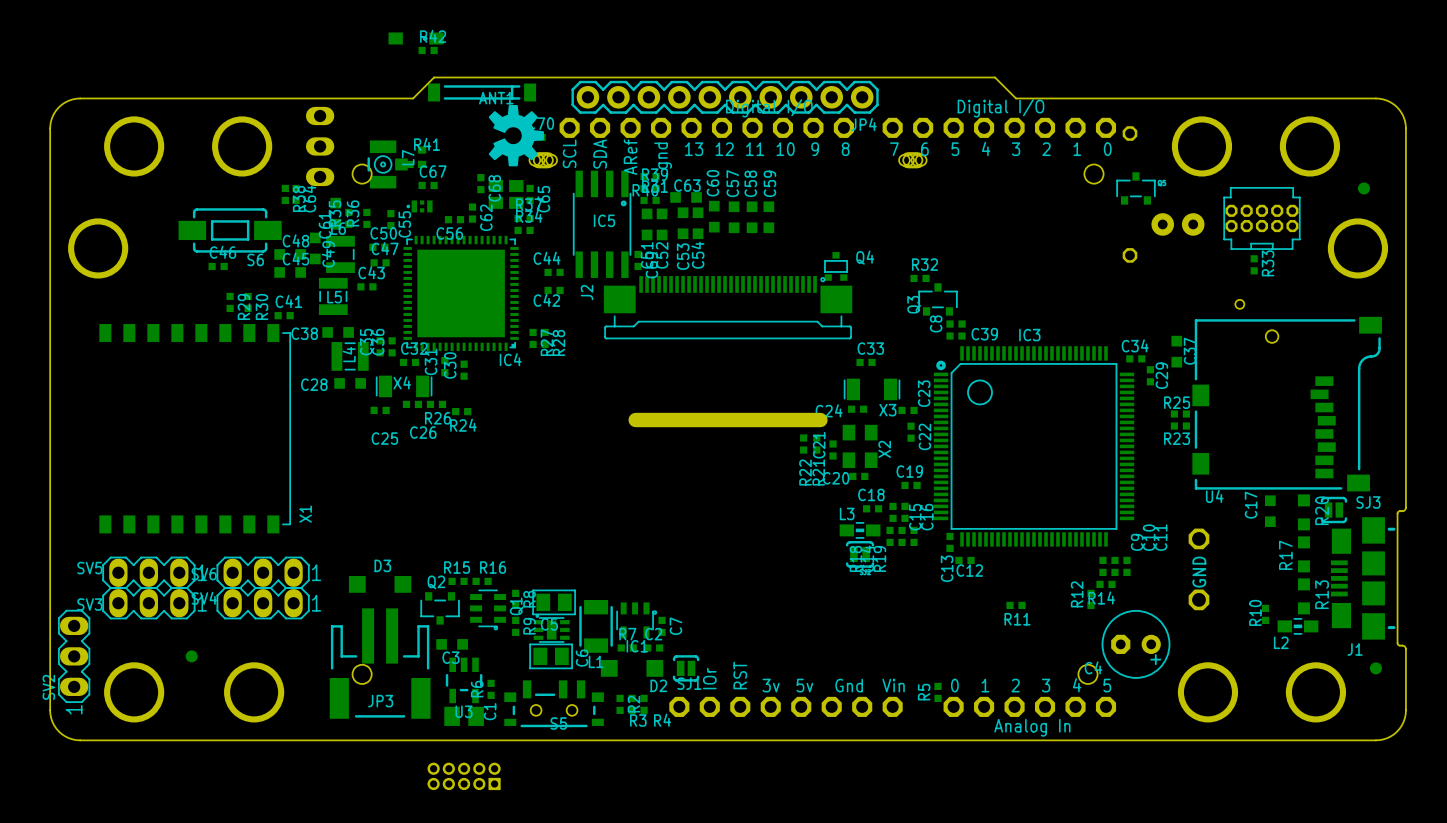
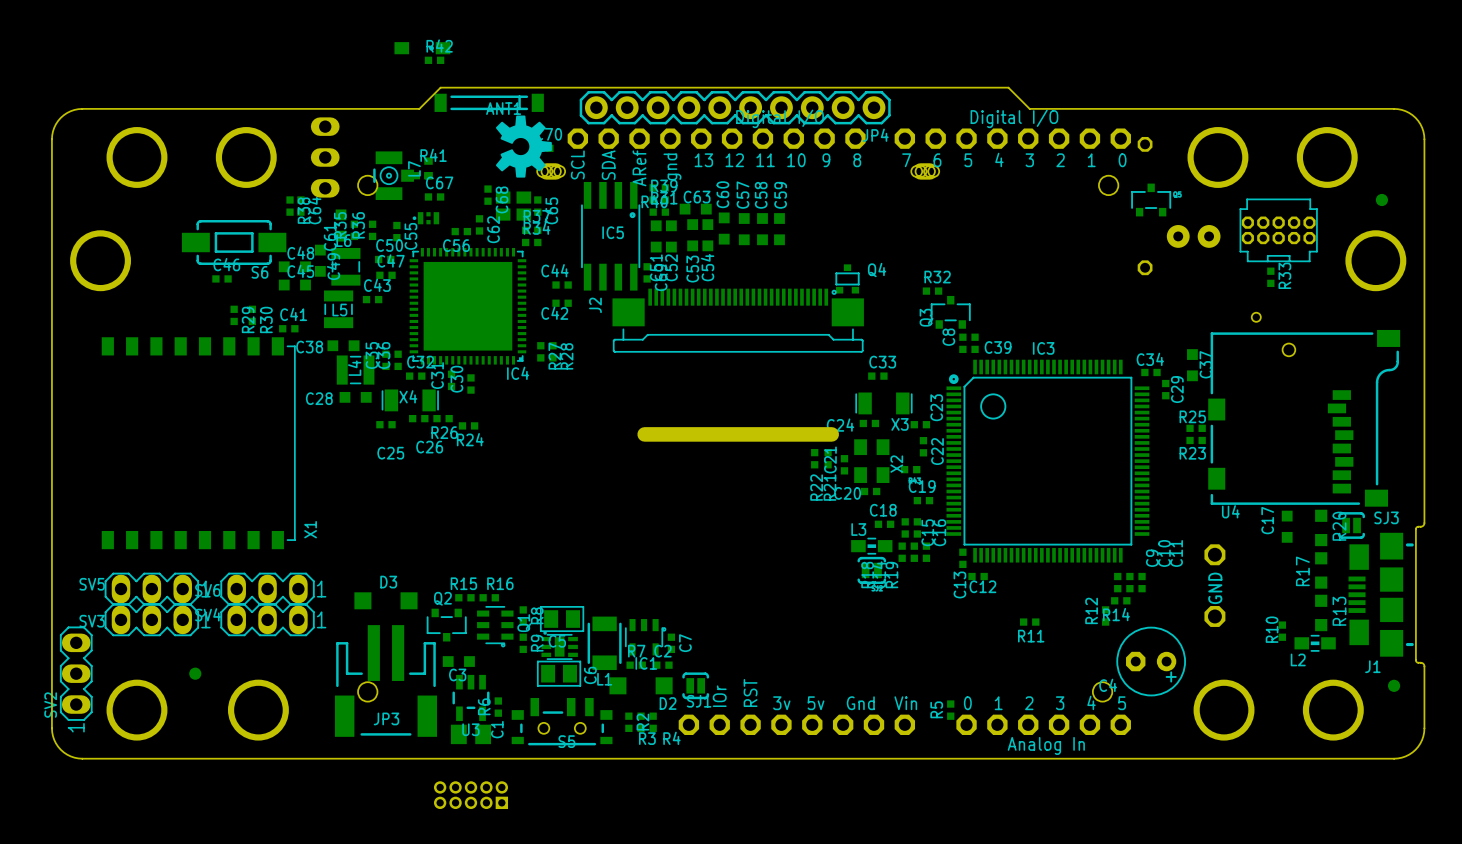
part: none -> (910, 469)

